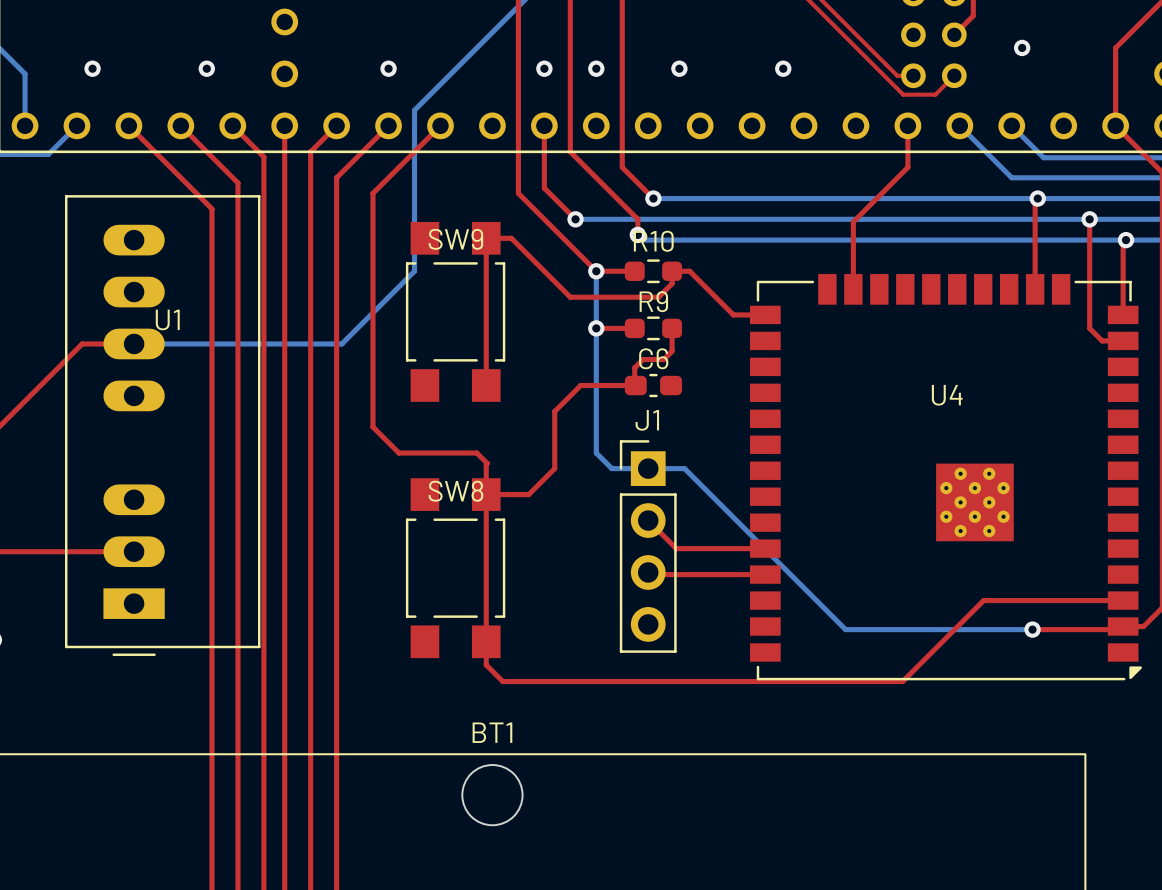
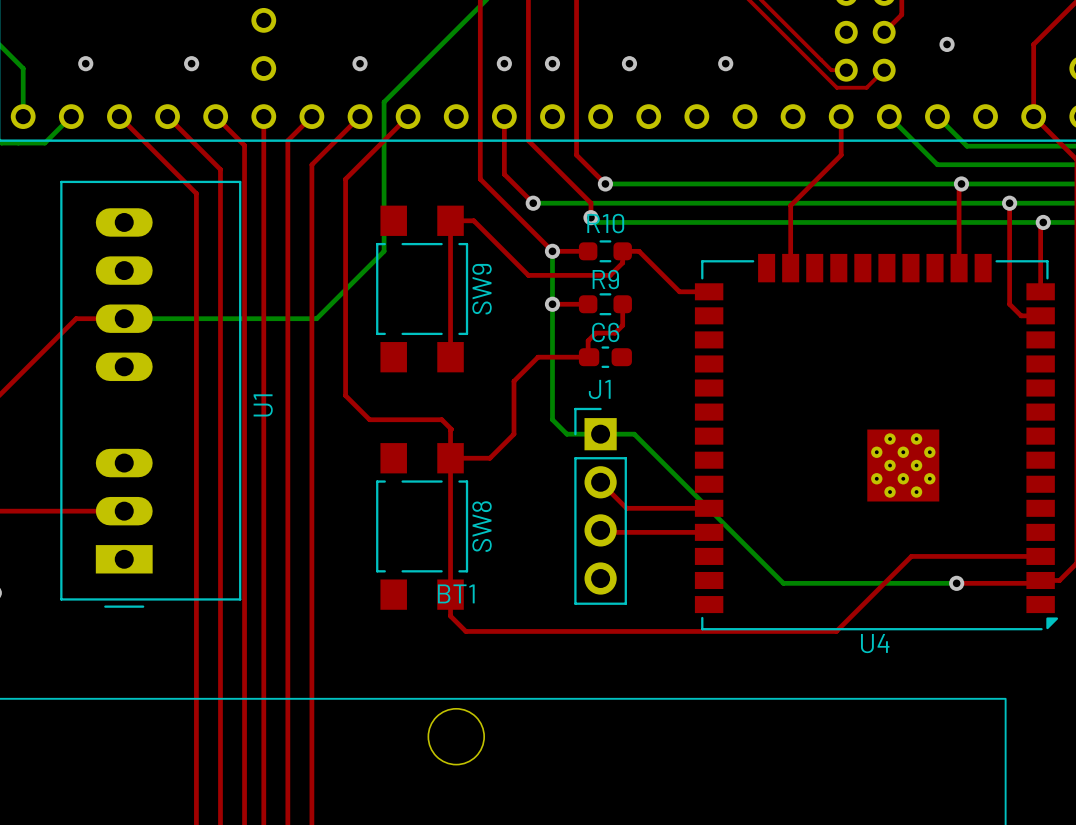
SW9 name rotation: 0° (455, 239) -> 90° counterclockwise (482, 289)
SW9 name position: SW9 (455, 239) -> SW9 (482, 289)
U1 name rotation: 0° (167, 319) -> 90° counterclockwise (263, 405)
U1 name position: U1 (167, 319) -> U1 (263, 405)
U4 name position: U4 (947, 395) -> U4 (875, 643)
SW8 name rotation: 0° (455, 491) -> 90° counterclockwise (482, 526)
SW8 name position: SW8 (455, 491) -> SW8 (482, 526)
BT1 name position: BT1 (492, 732) -> BT1 (456, 593)

